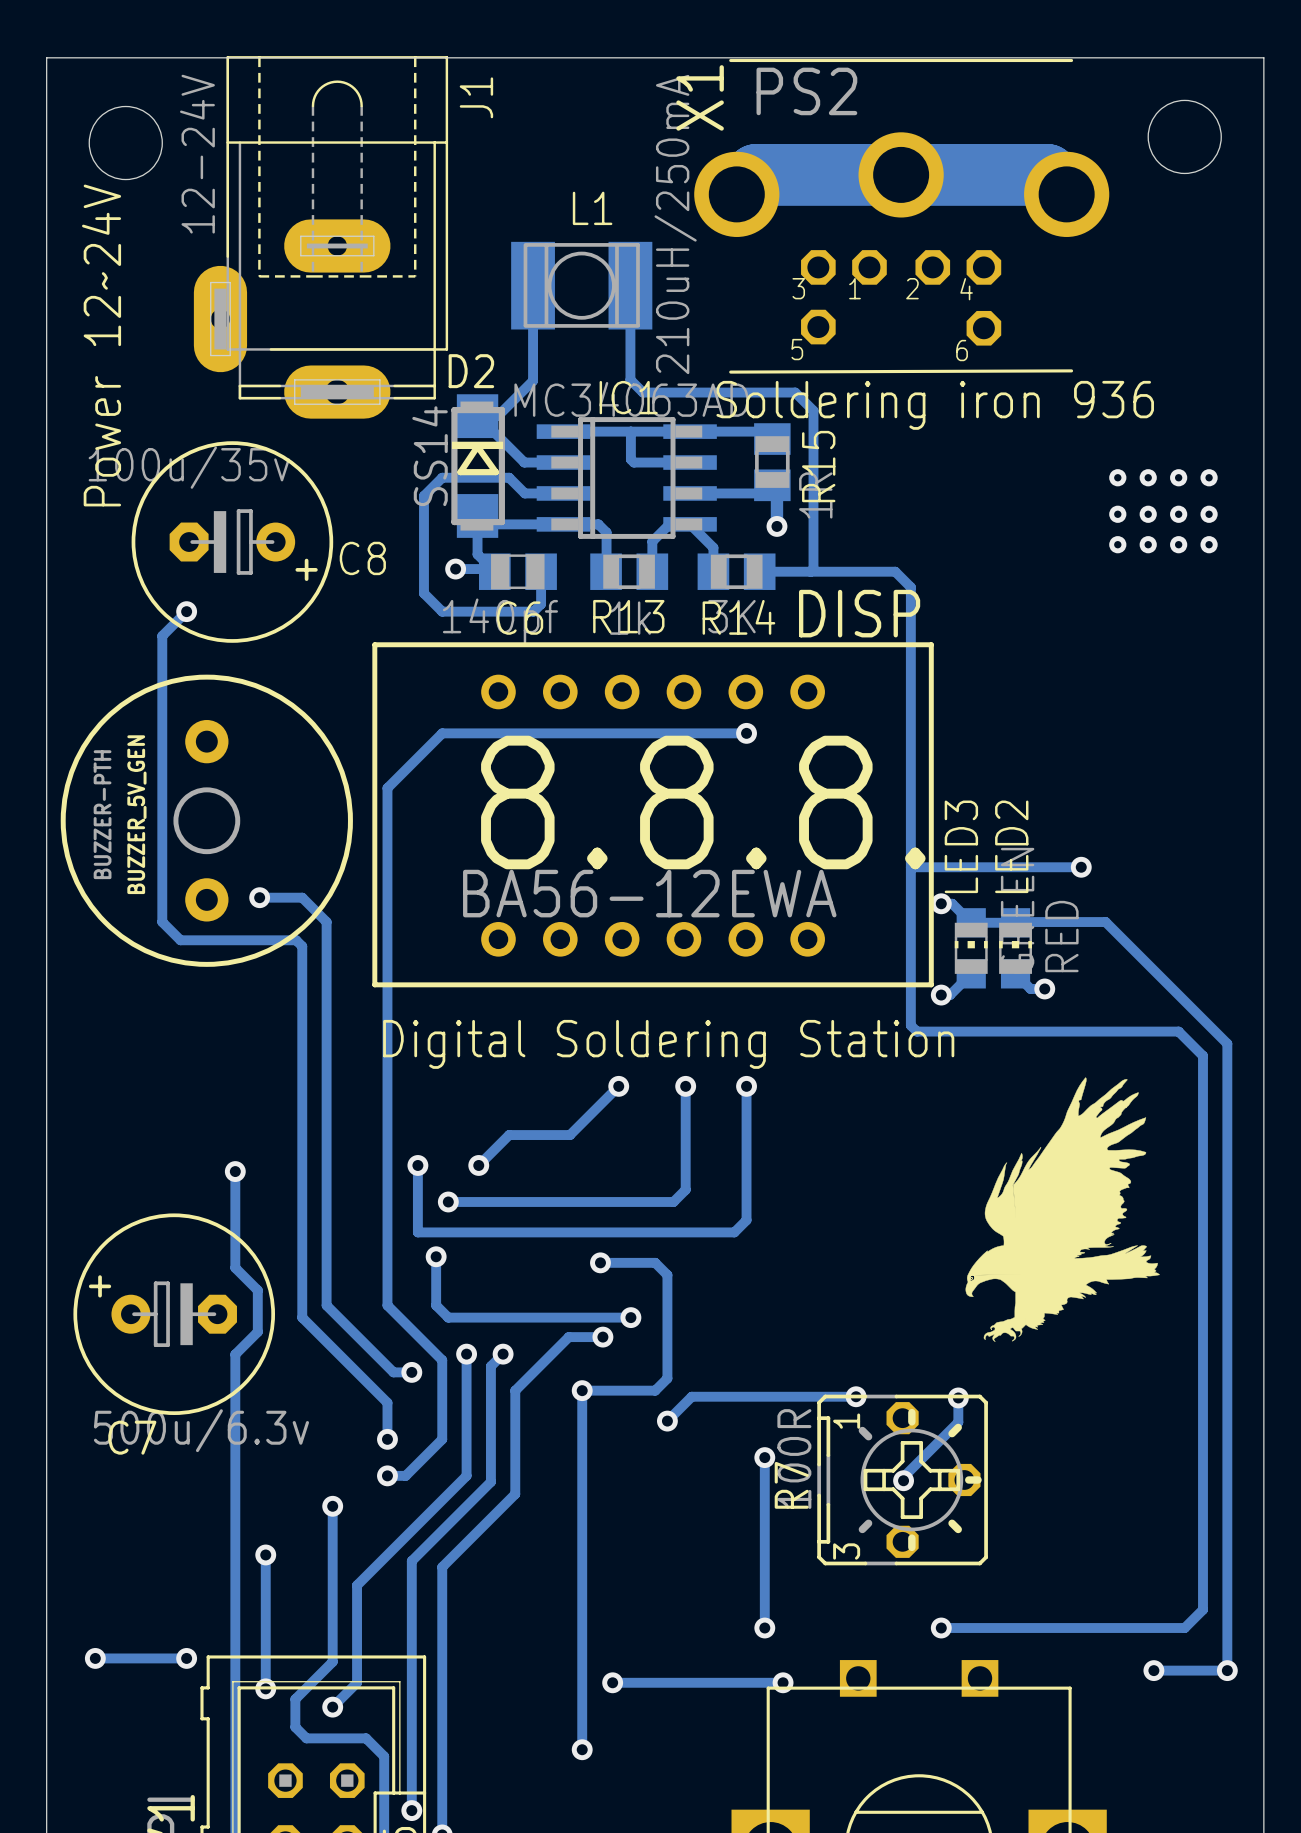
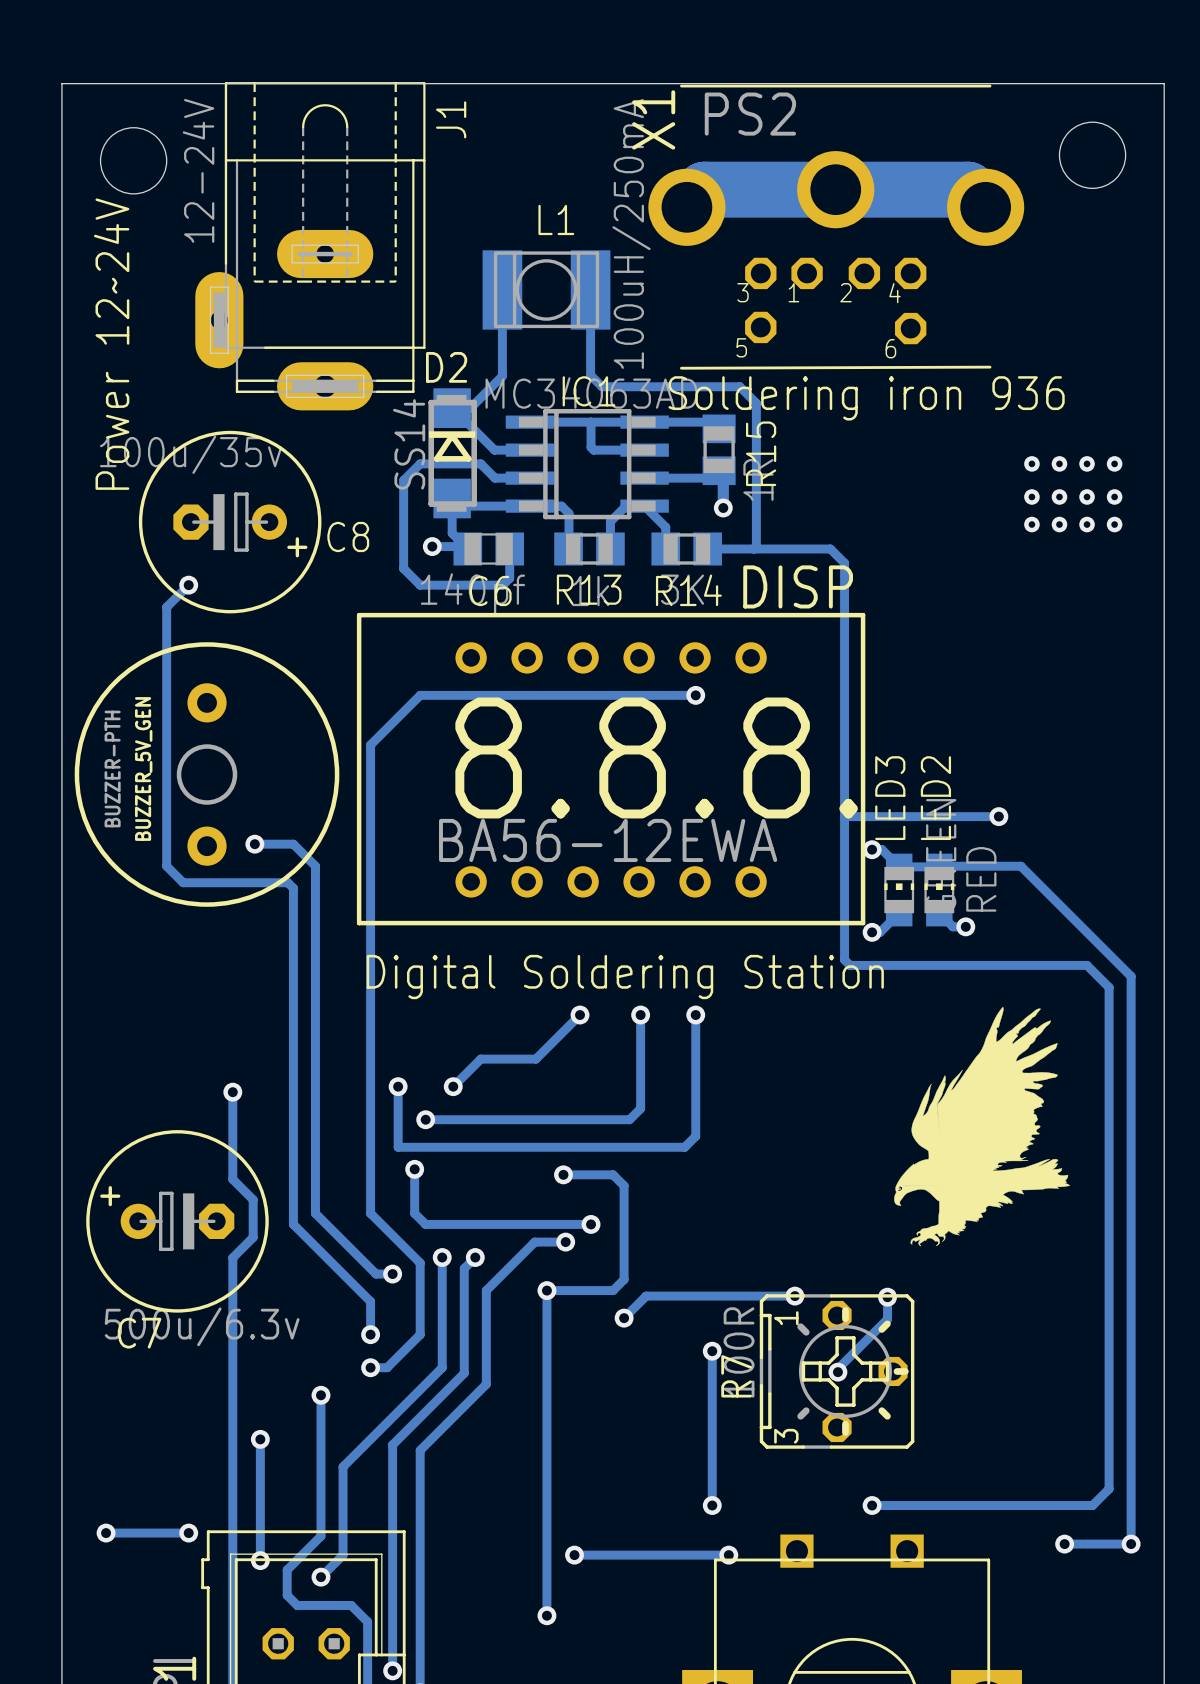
L1 value: 210uH/250mA (675, 224) -> 100uH/250mA (631, 233)

